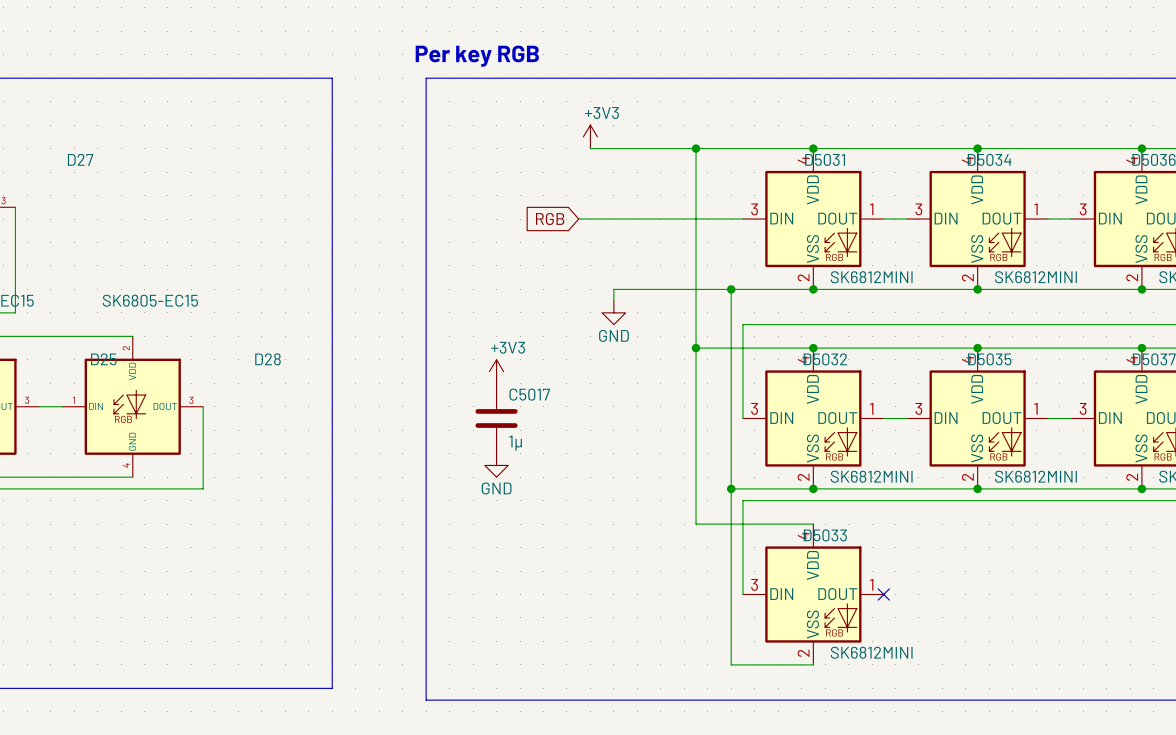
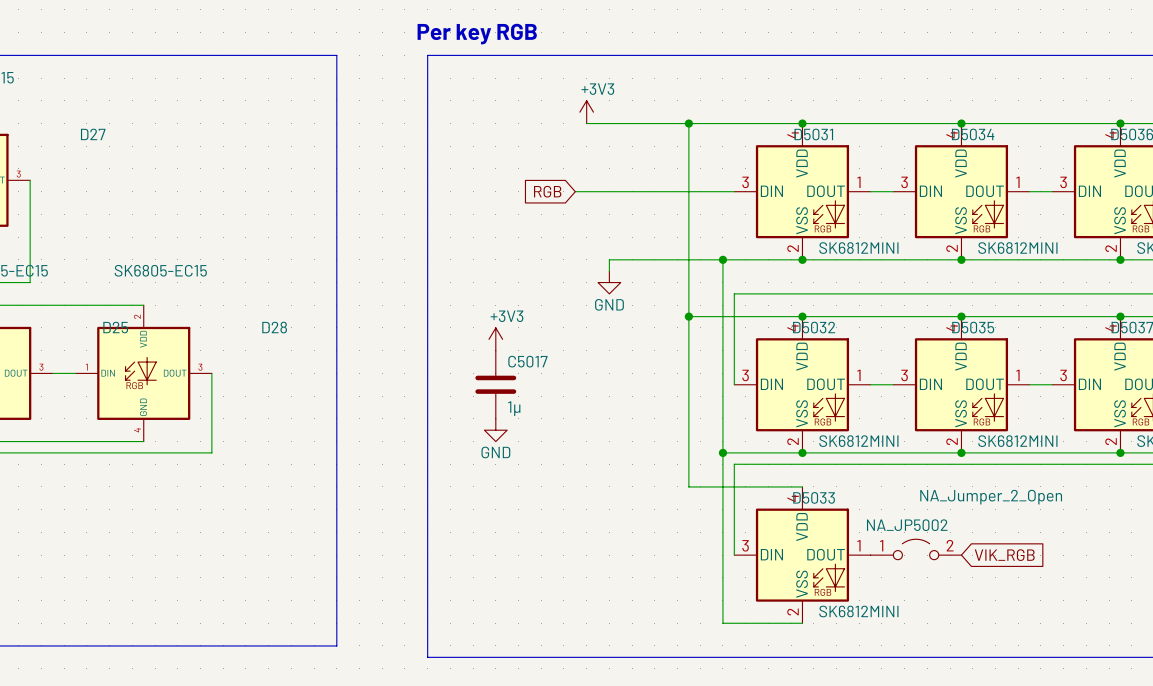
NA_JP5002: none -> NA_Jumper_2_Open (916, 549)
no-connect mark: (883, 594) -> none
global label: none -> VIK_RGB (1004, 555)

